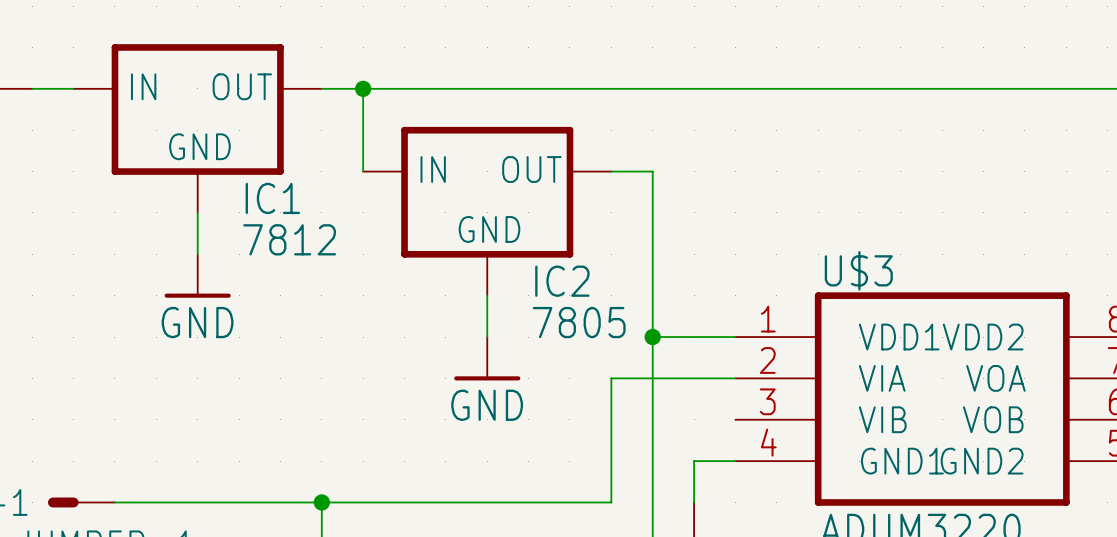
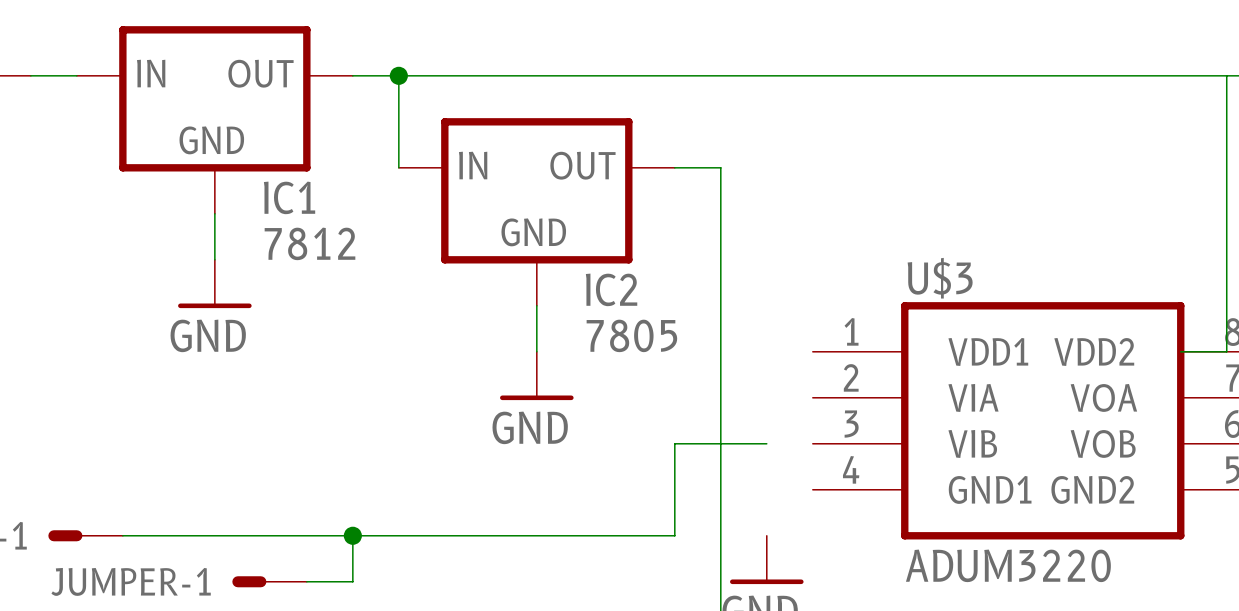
wire: none -> (1226, 75) (1226, 351) (1180, 351)
wire: (652, 337) (735, 337) -> none
junction: (652, 337) -> none
wire: (735, 378) (611, 378) (611, 419) -> (766, 443) (674, 443)
wire: (735, 461) (694, 461) (694, 502) -> none

